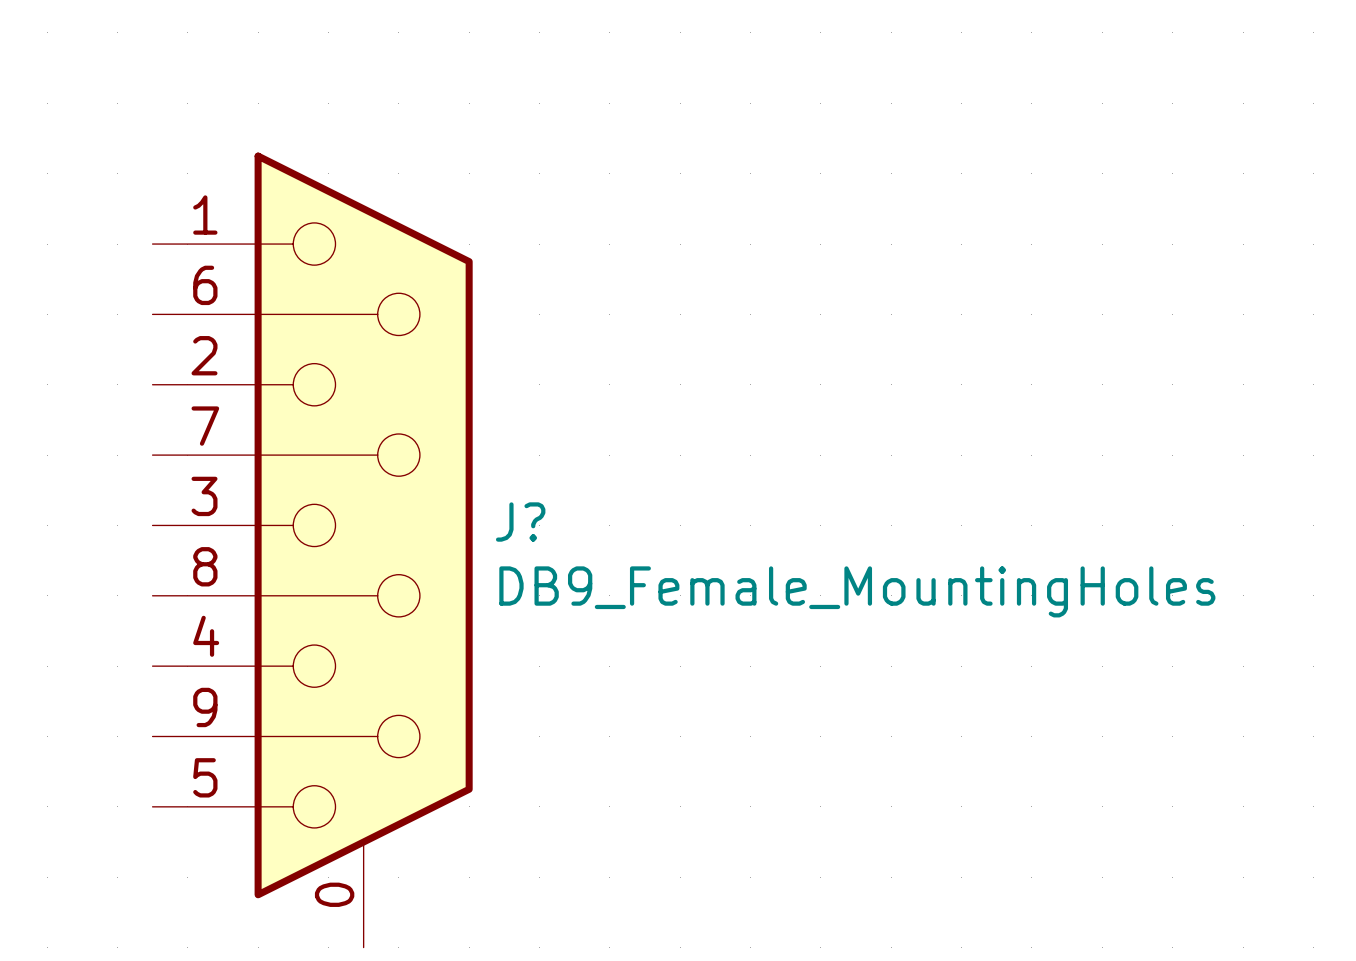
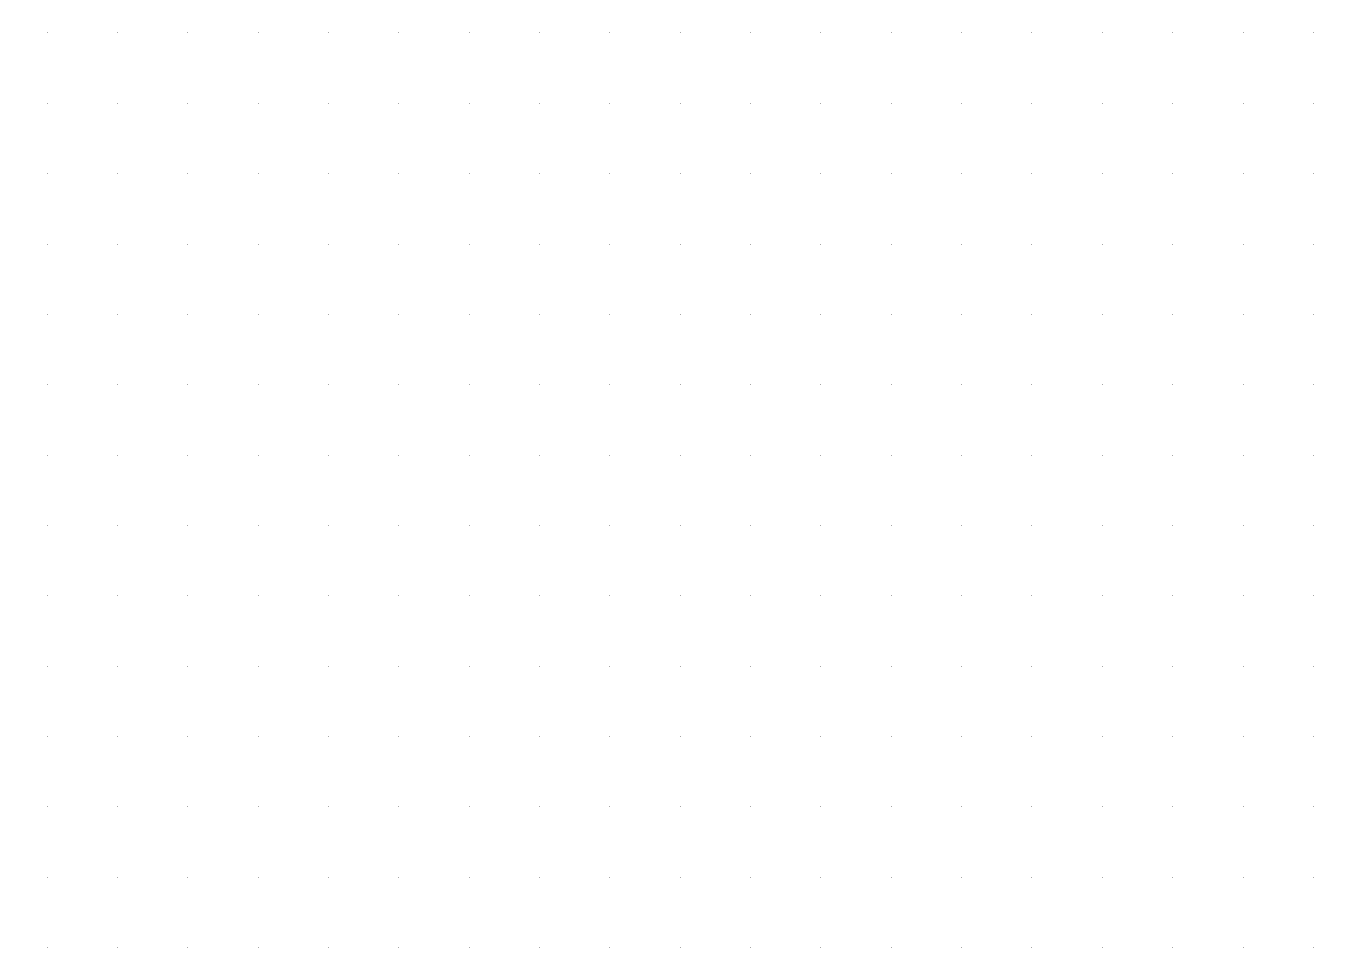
J?: DB9_Female_MountingHoles (312, 550) -> none

